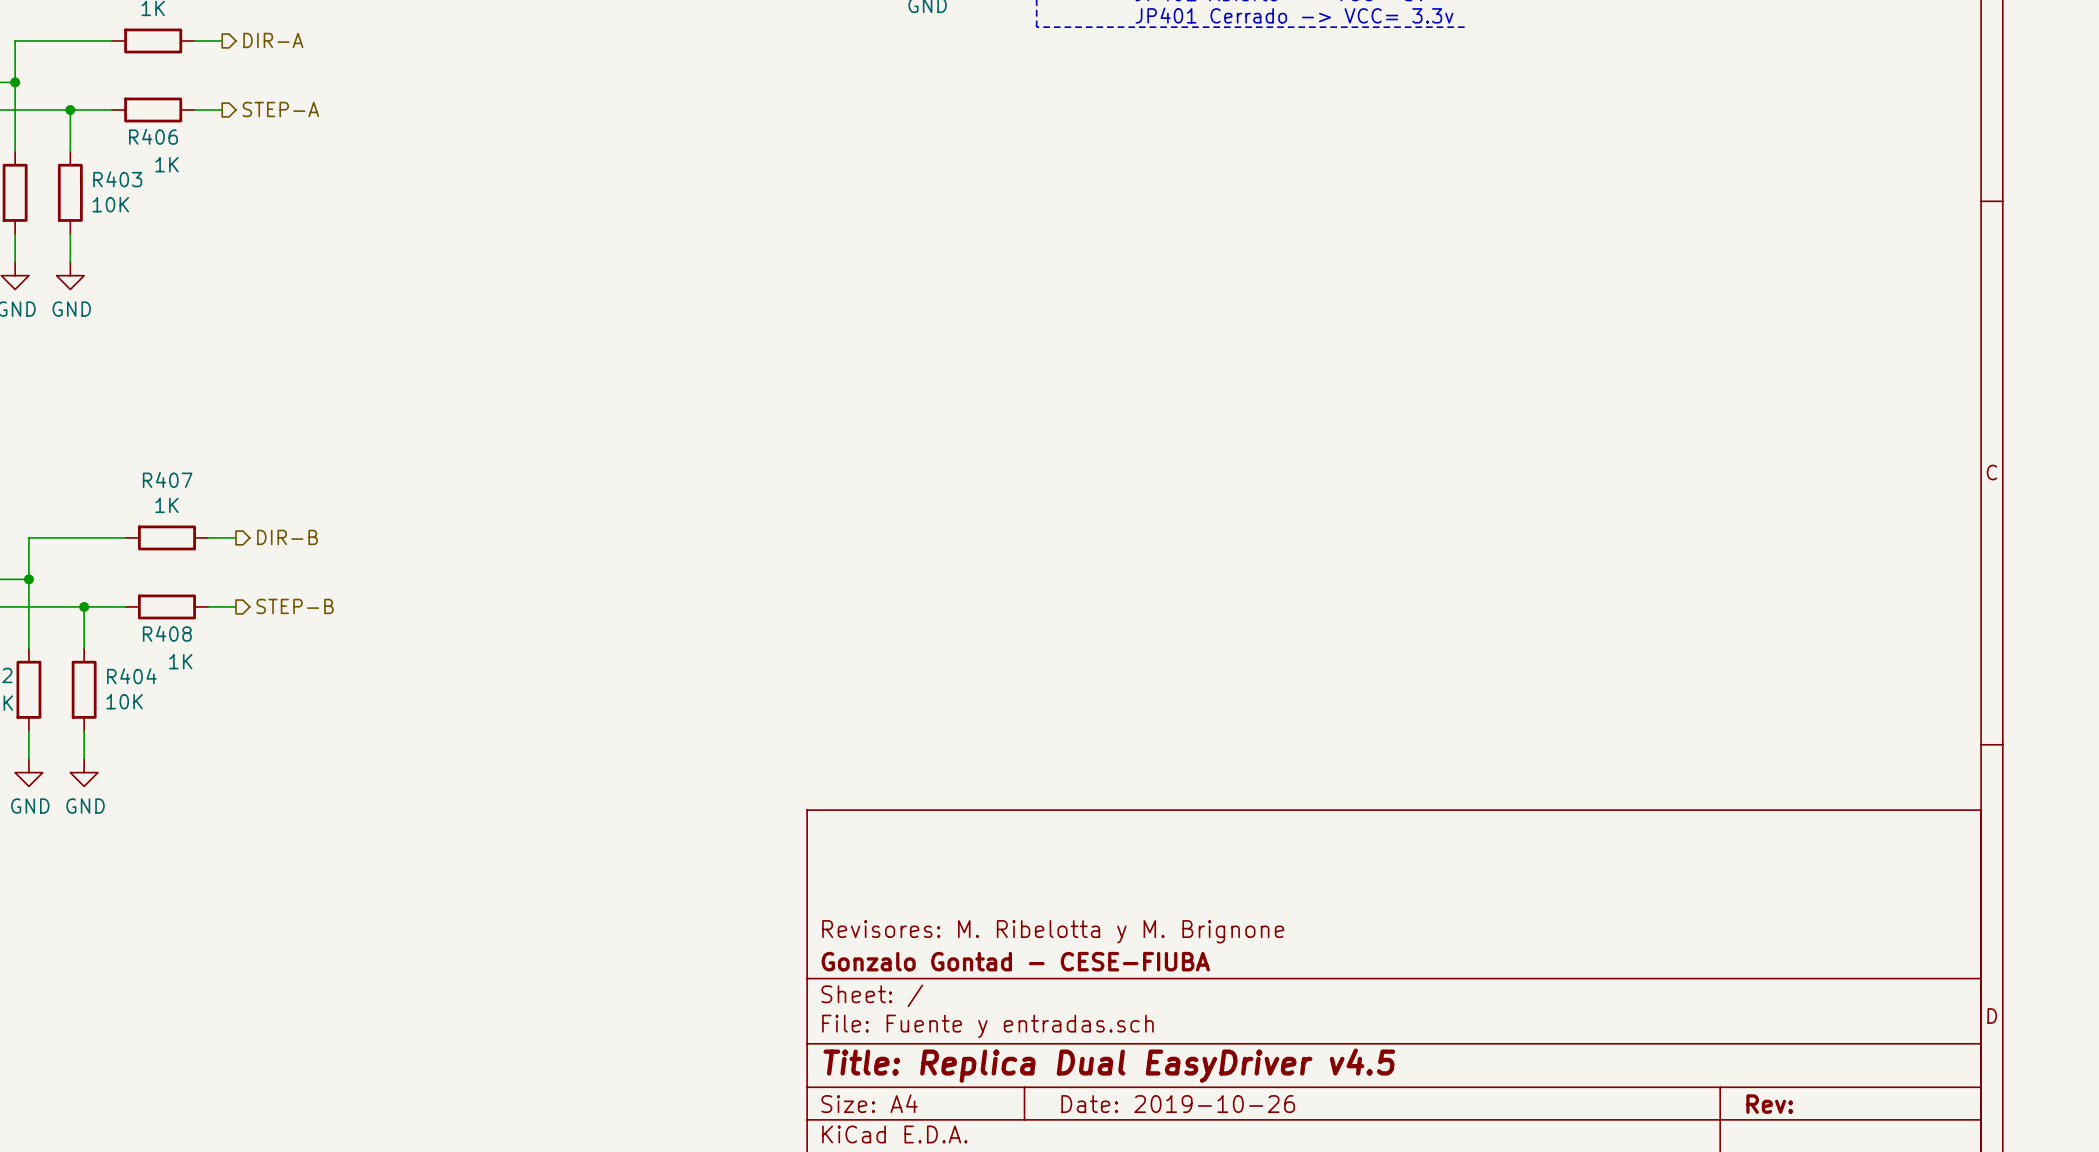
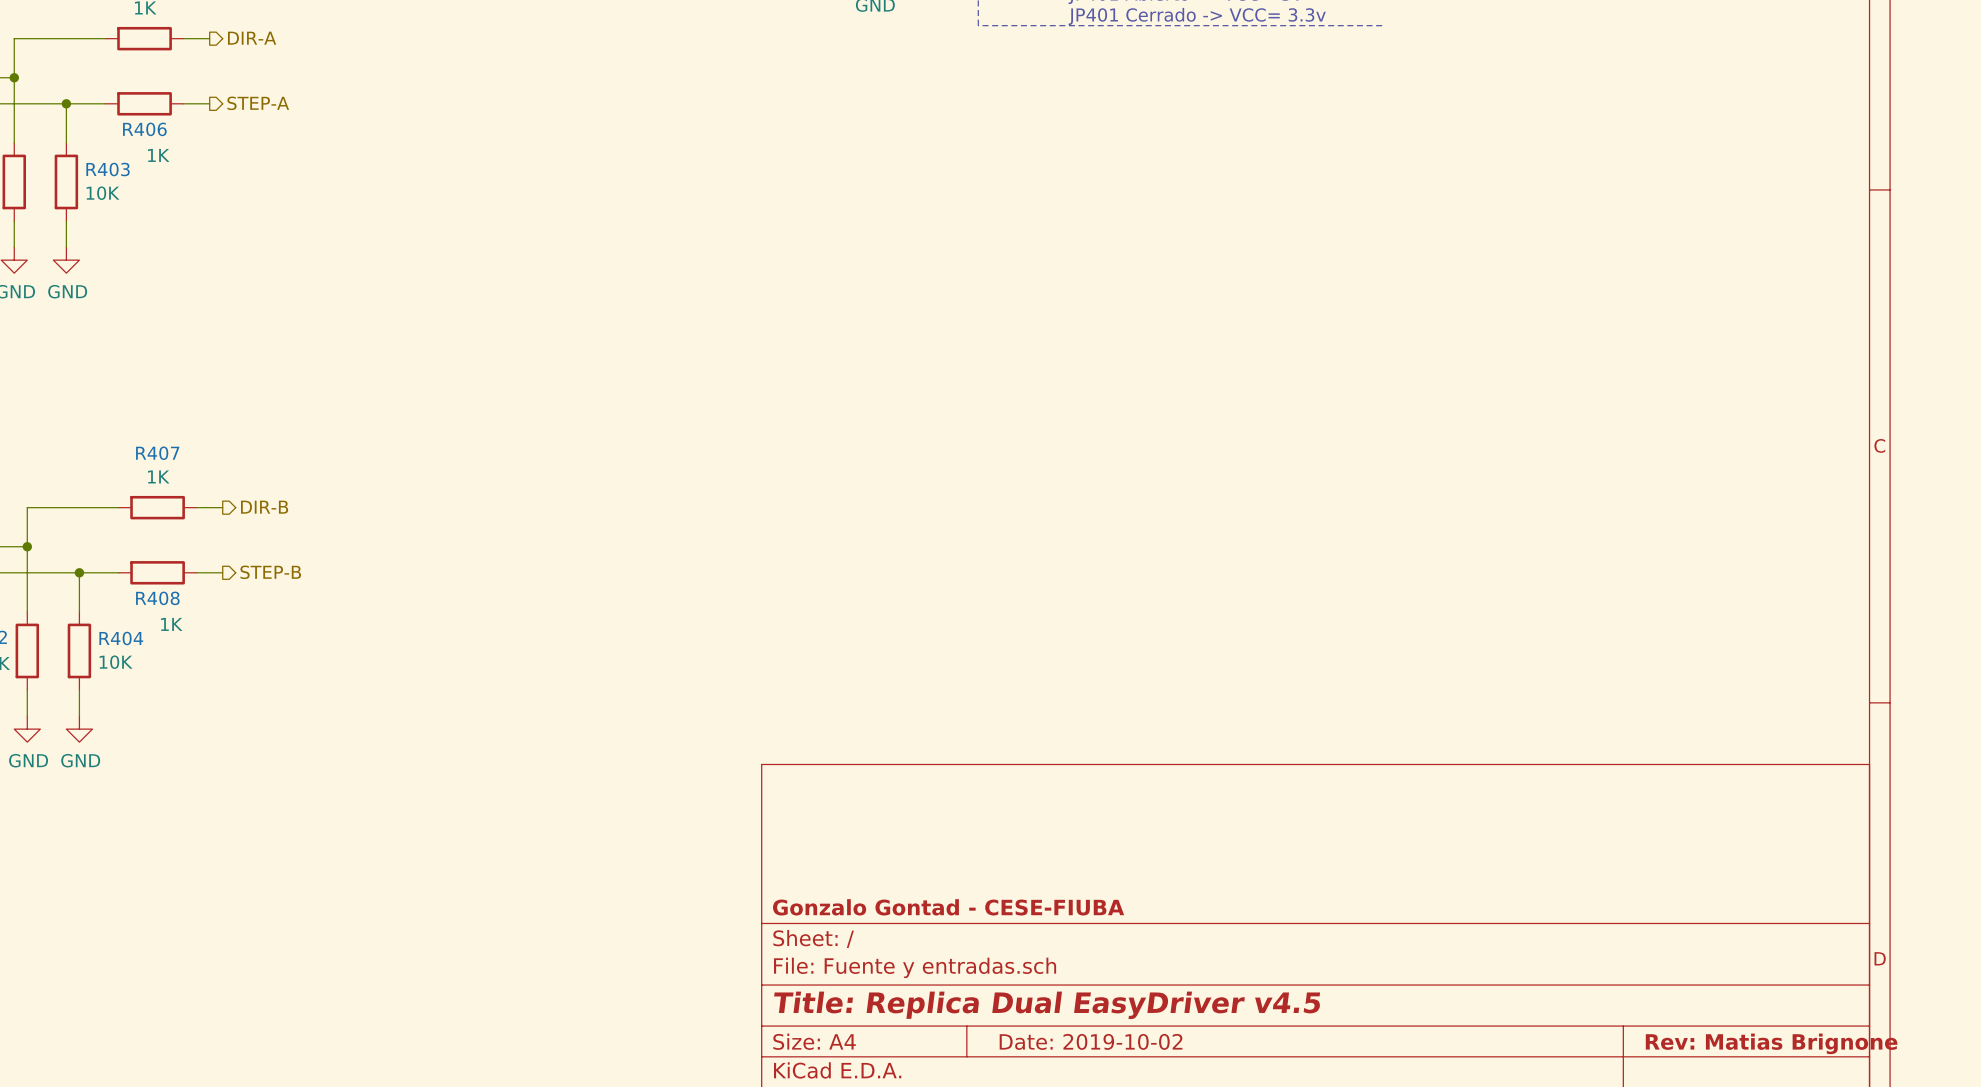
title block: Revisores: M. Ribelotta y M. Brignone (1053, 931) -> none
title block: Date: 2019-10-26 (1178, 1104) -> Date: 2019-10-02 (1091, 1041)
title block: Rev: (1769, 1104) -> Rev: Matias Brignone (1771, 1043)

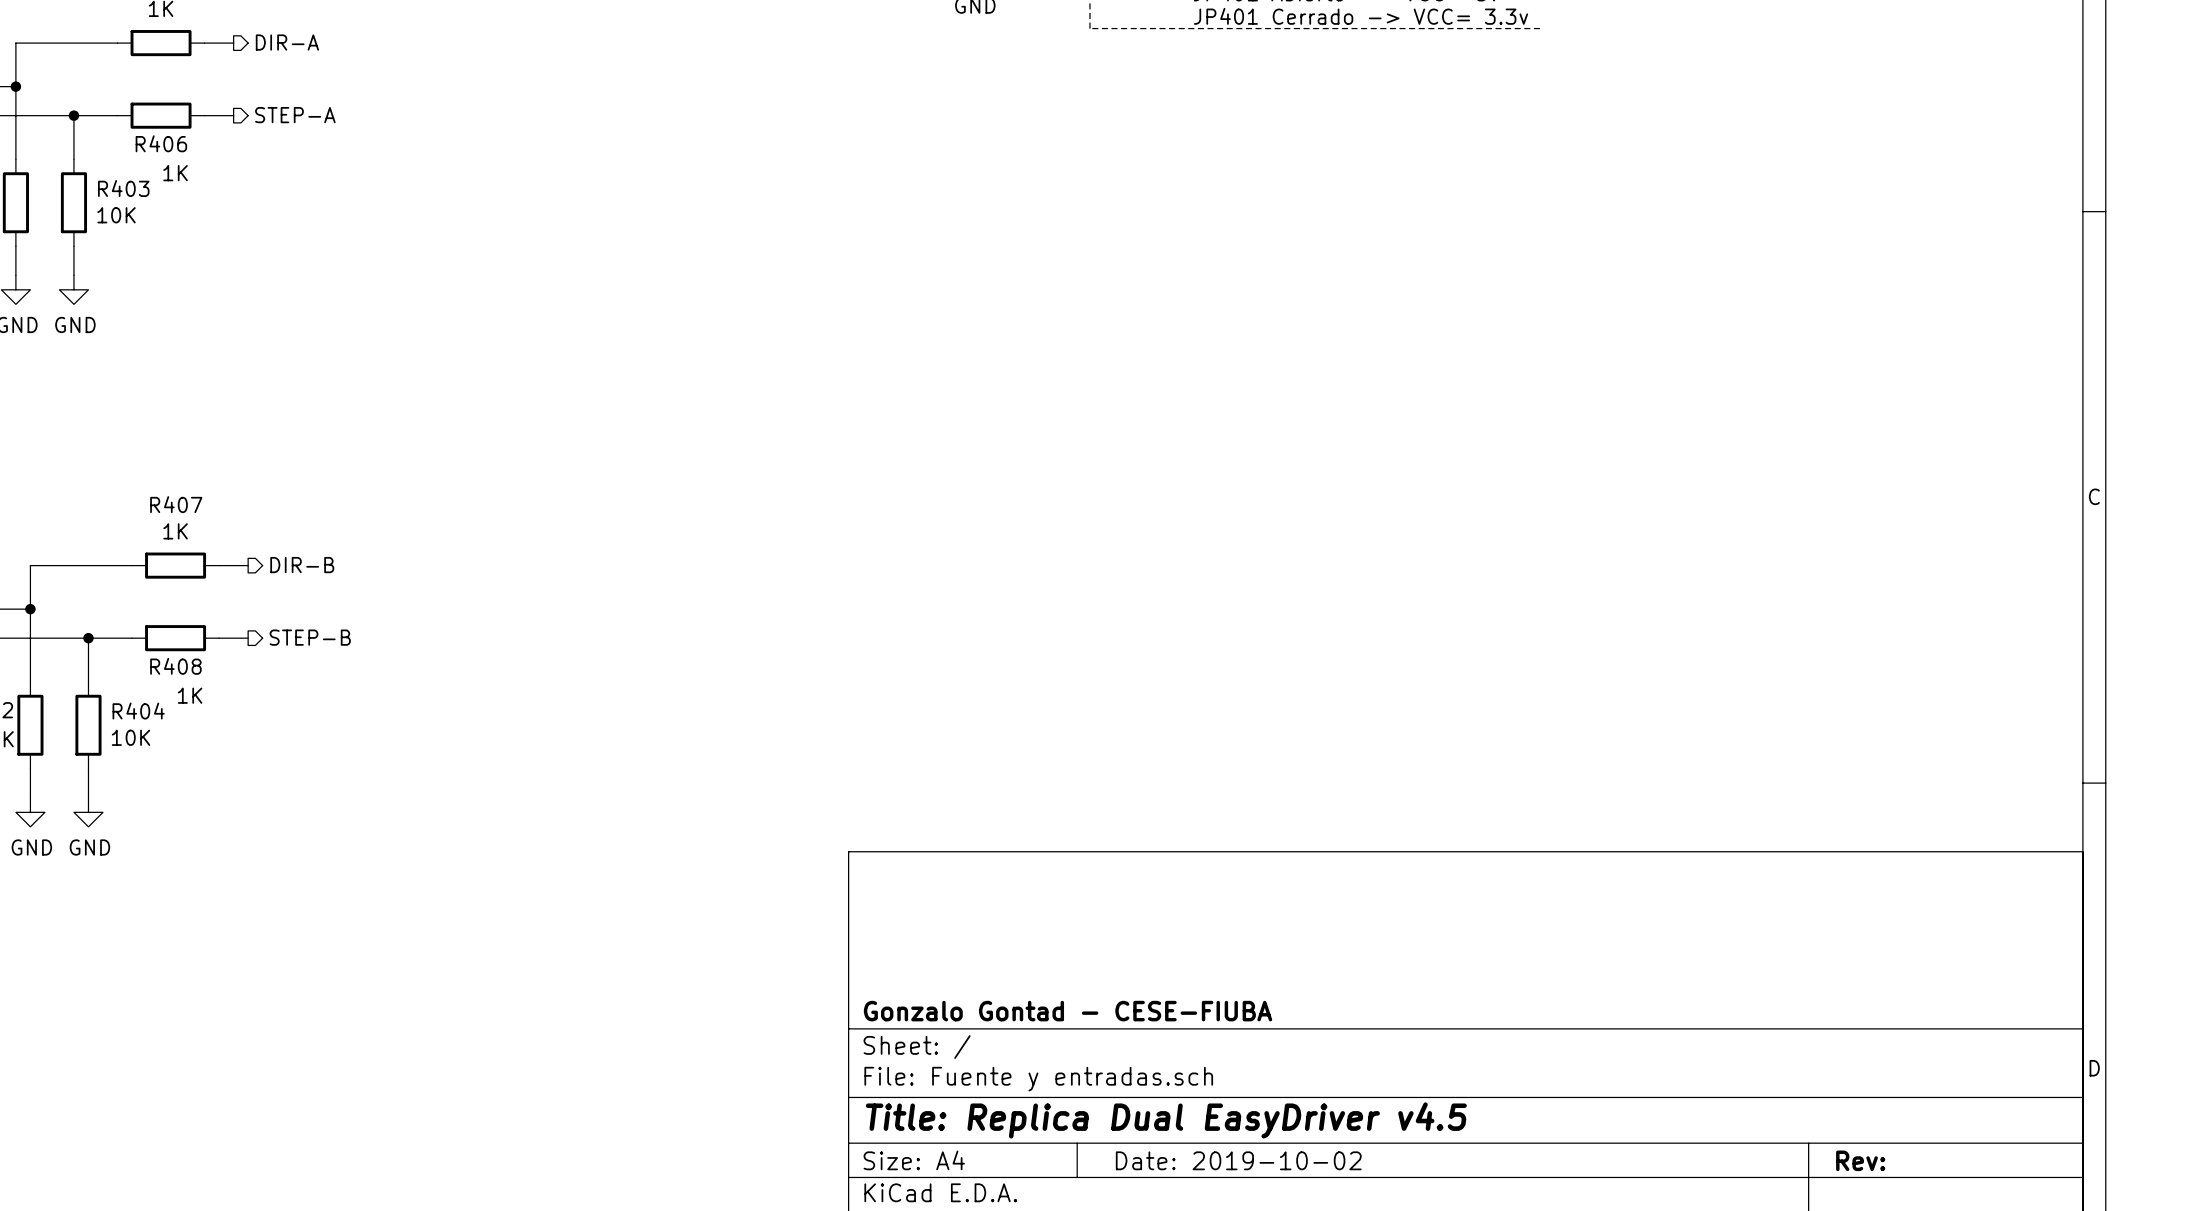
title block: Rev: Matias Brignone (1771, 1043) -> Rev: (1860, 1160)

